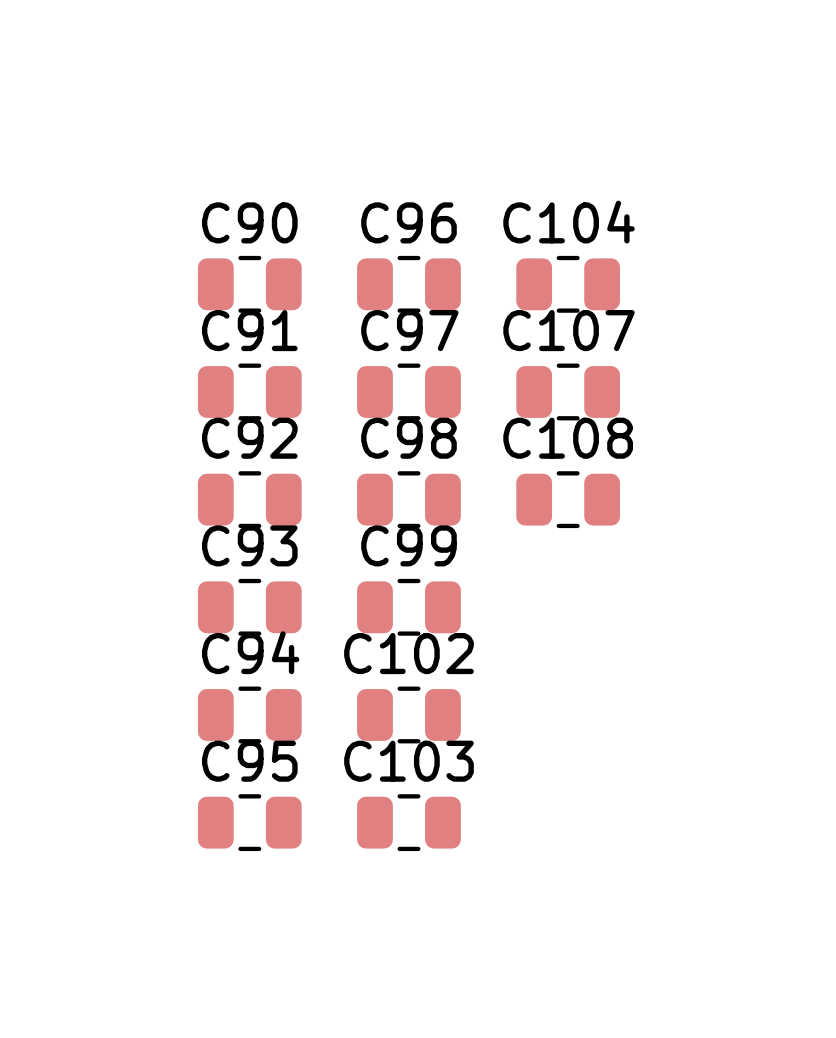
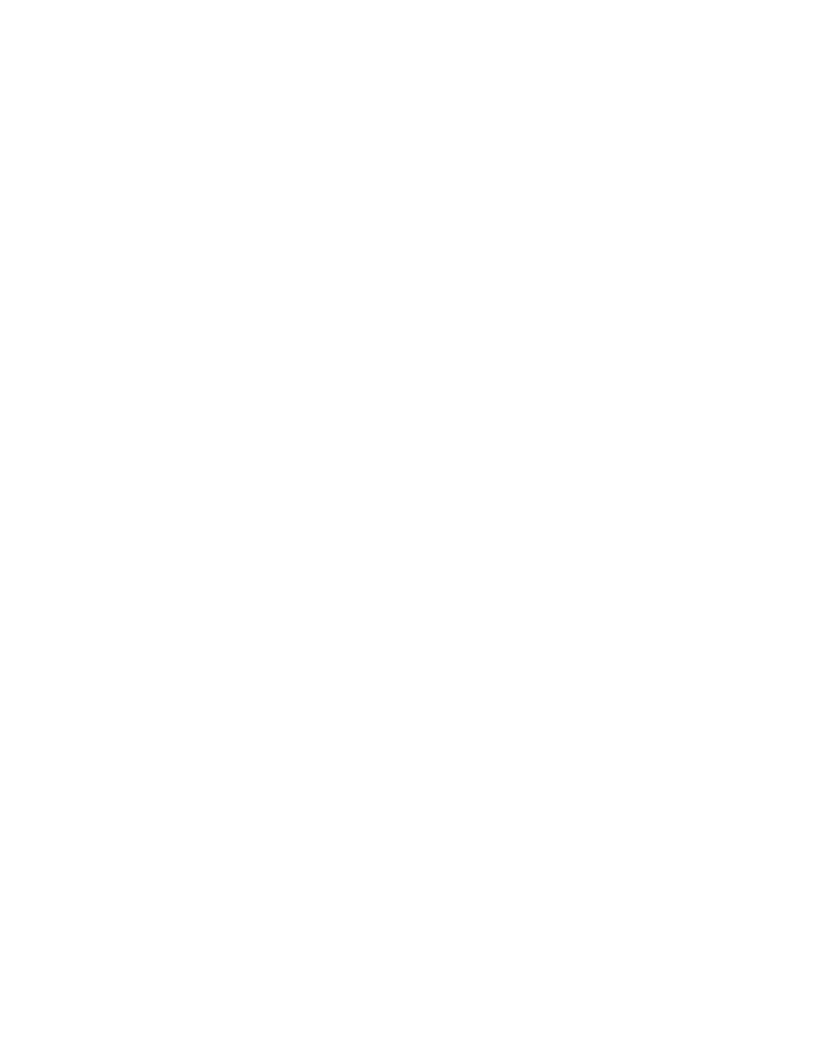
C90: (249, 284) -> none
C96: (408, 284) -> none
C104: (568, 284) -> none
C91: (249, 391) -> none
C97: (408, 391) -> none
C107: (568, 391) -> none
C92: (249, 499) -> none
C98: (408, 499) -> none
C108: (568, 499) -> none
C93: (249, 607) -> none
C99: (408, 607) -> none
C94: (249, 714) -> none
C102: (408, 714) -> none
C95: (249, 822) -> none
C103: (408, 822) -> none

